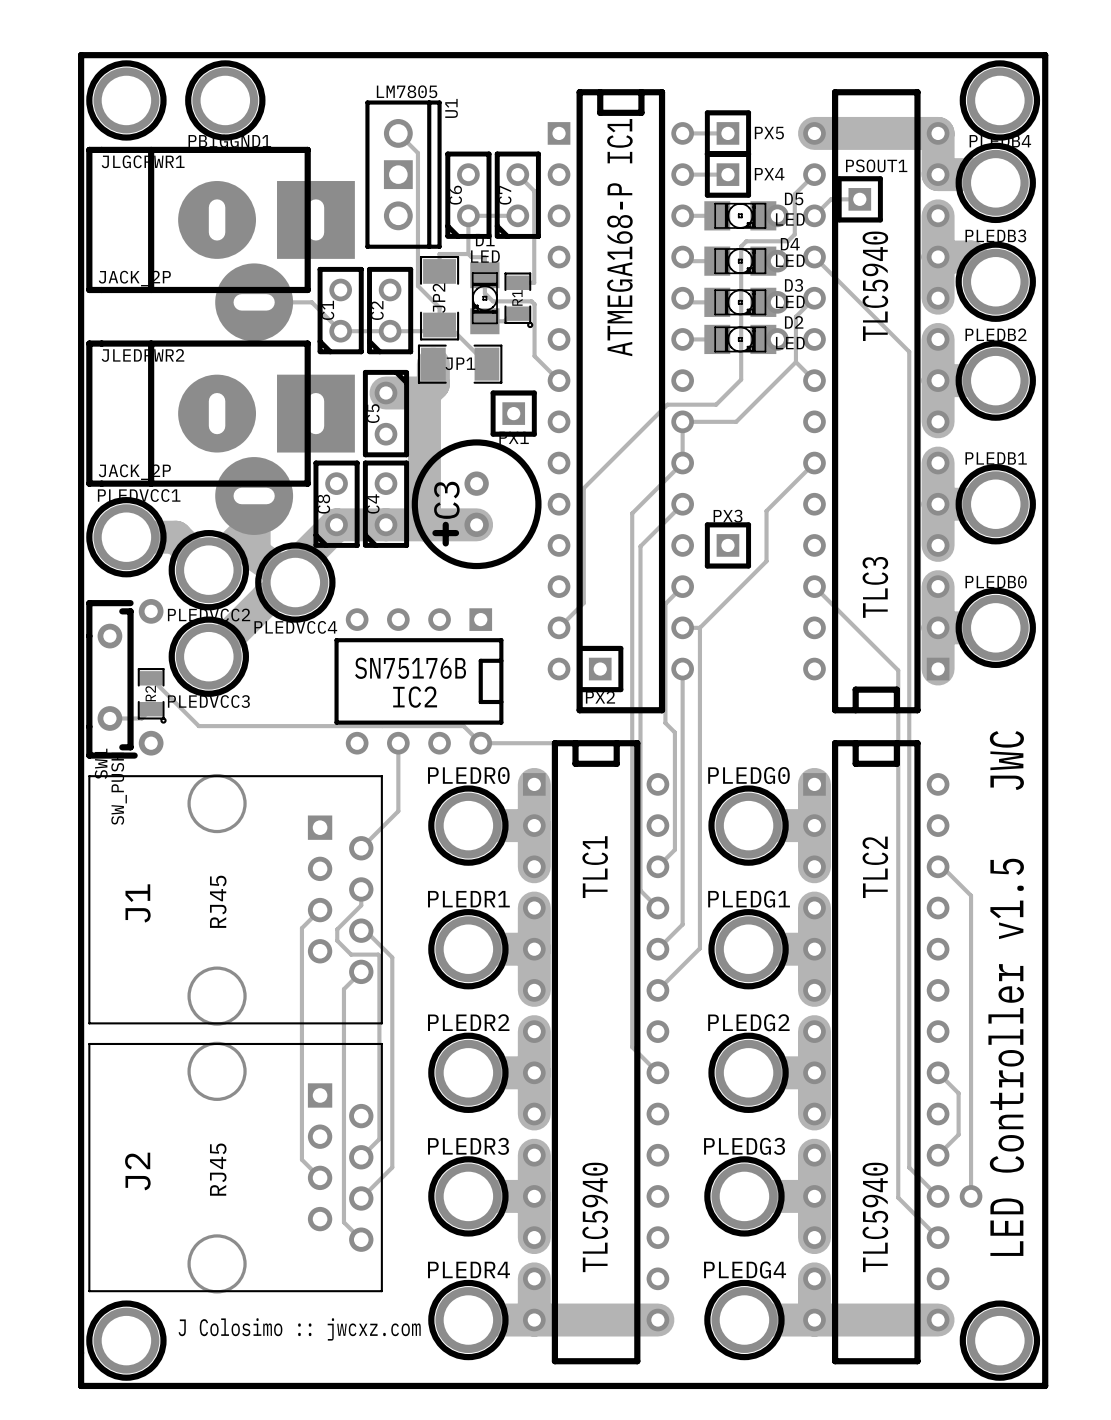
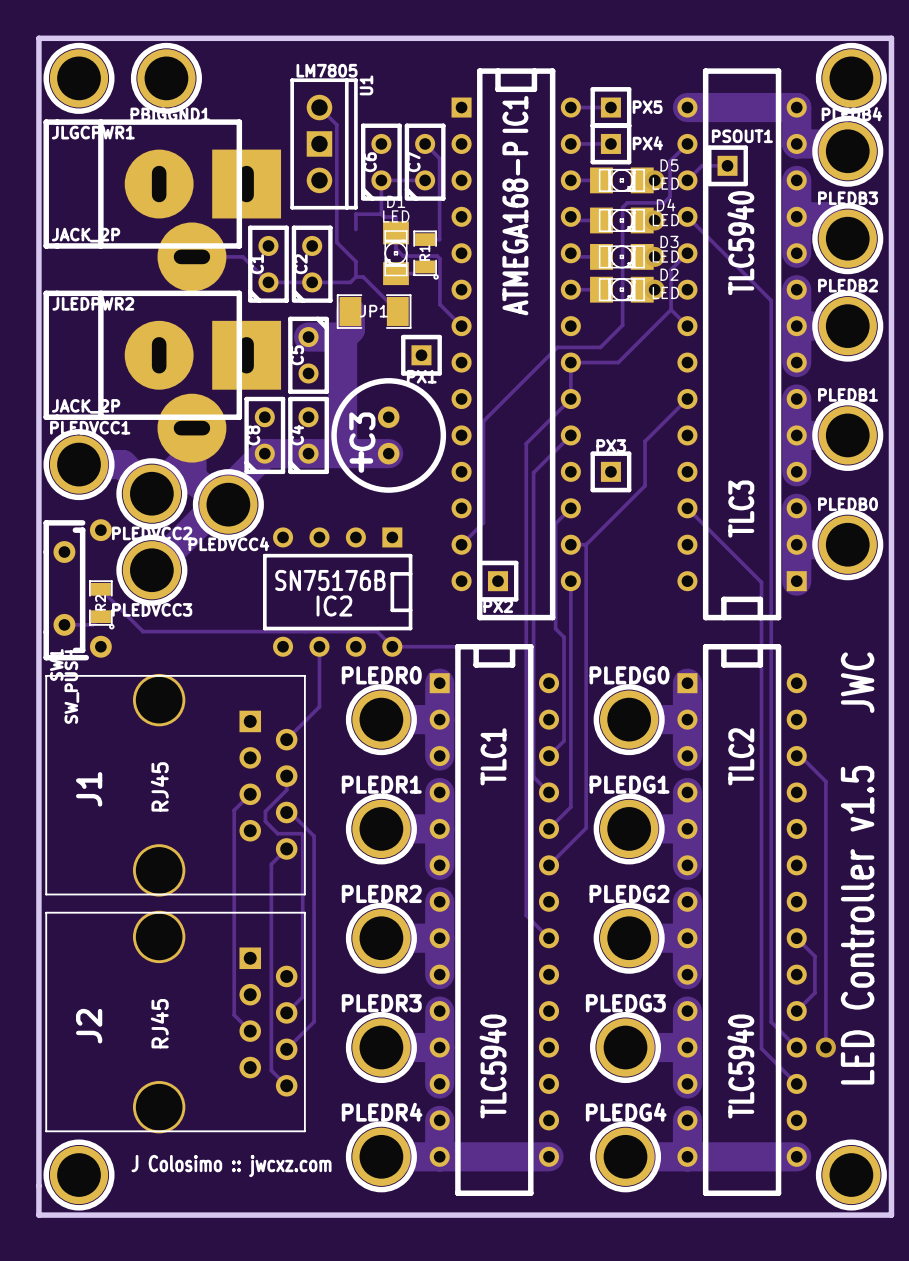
JP2: (439, 298) -> none

